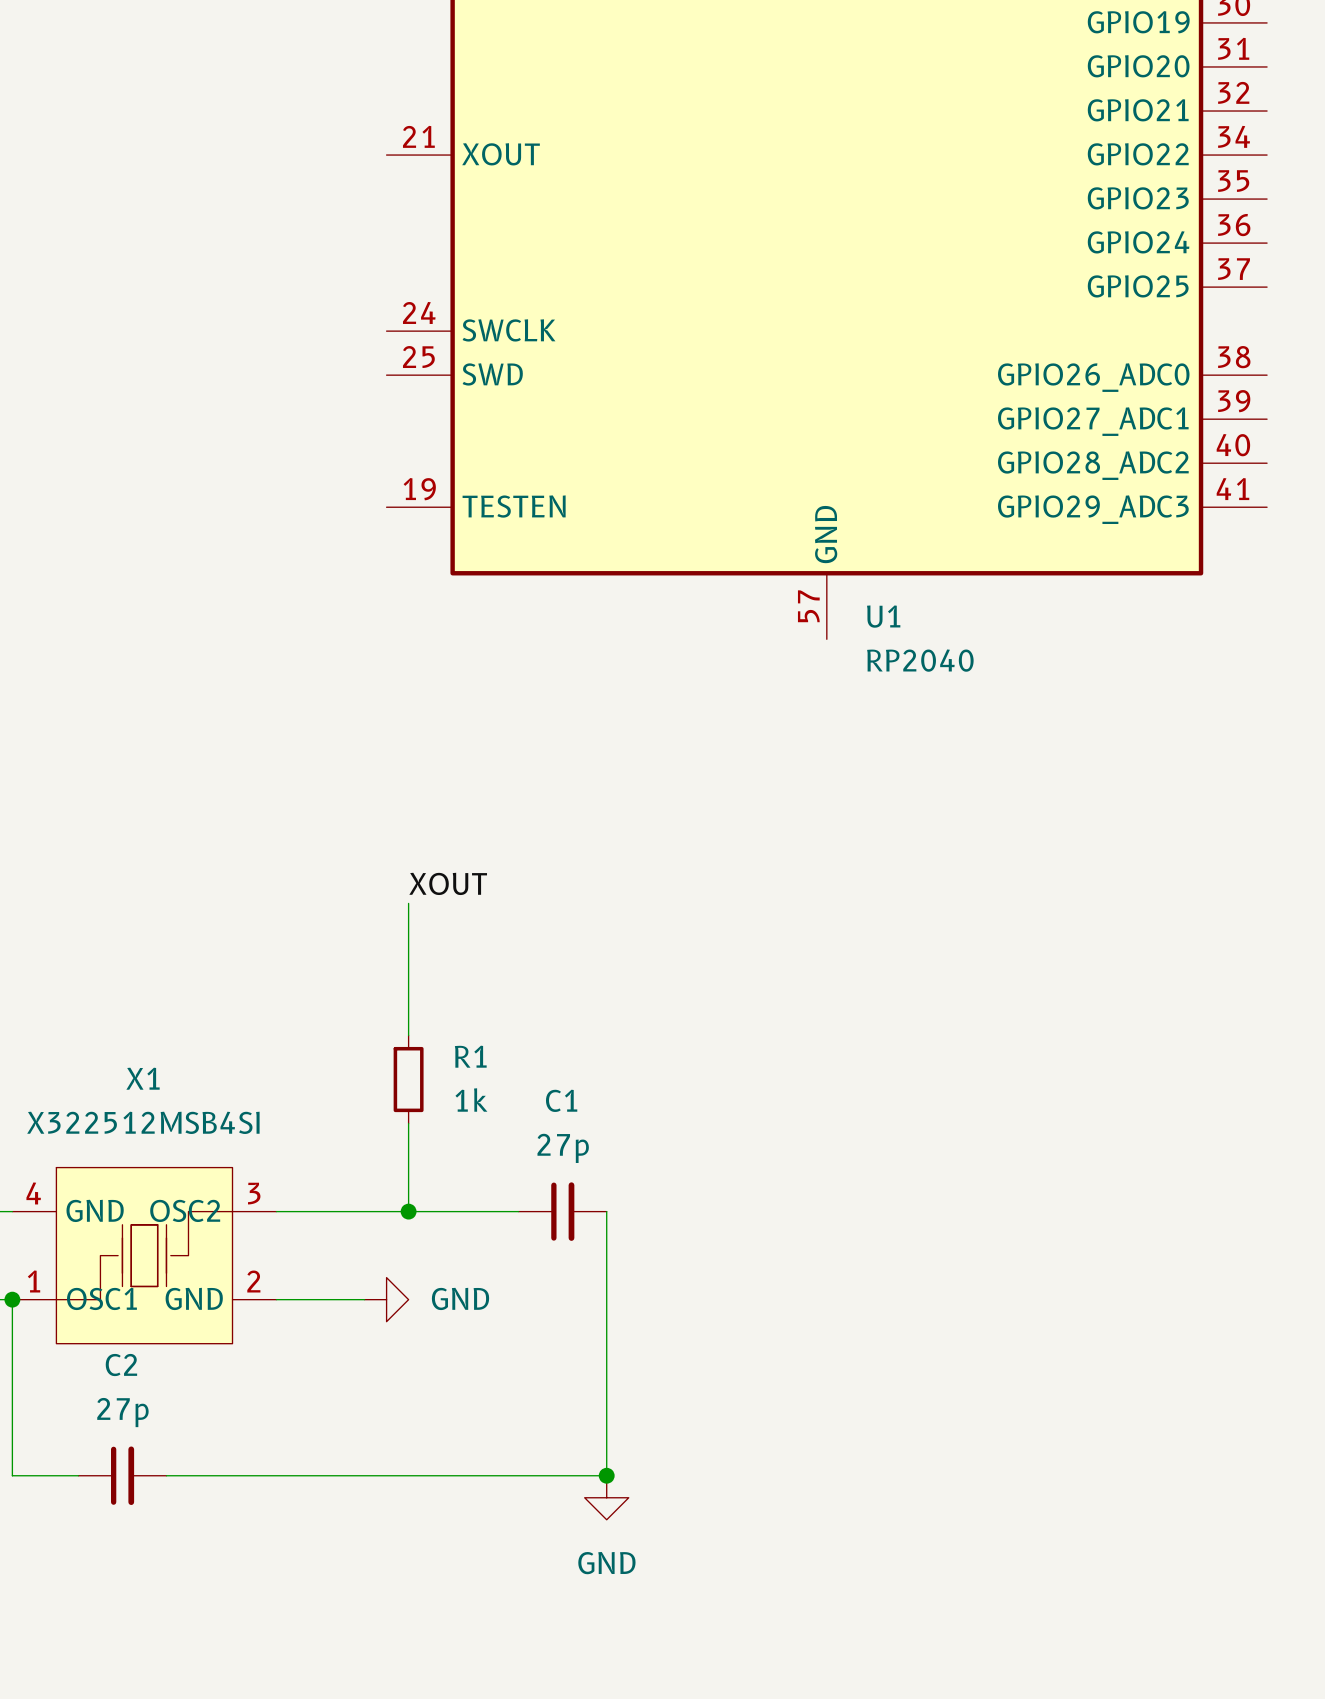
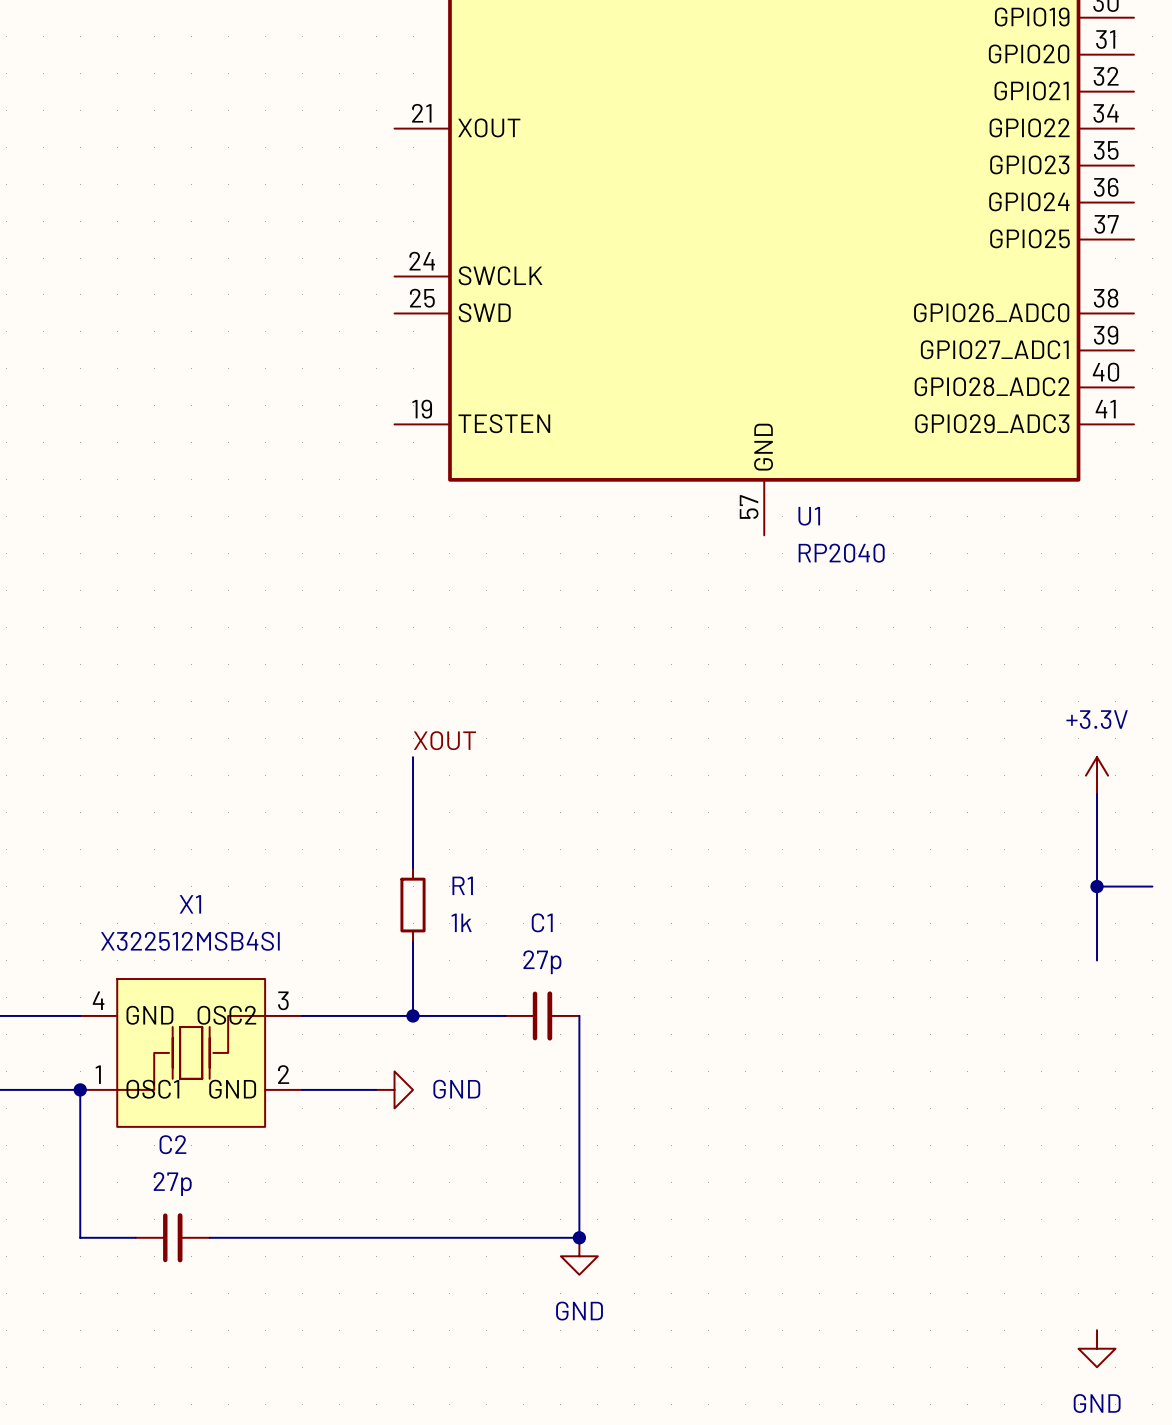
power symbol: none -> +3.3V (1097, 775)
wire: none -> (1097, 794) (1097, 960)
wire: none -> (1097, 886) (1152, 886)
junction: none -> (1097, 886)
power symbol: none -> GND (1097, 1348)

